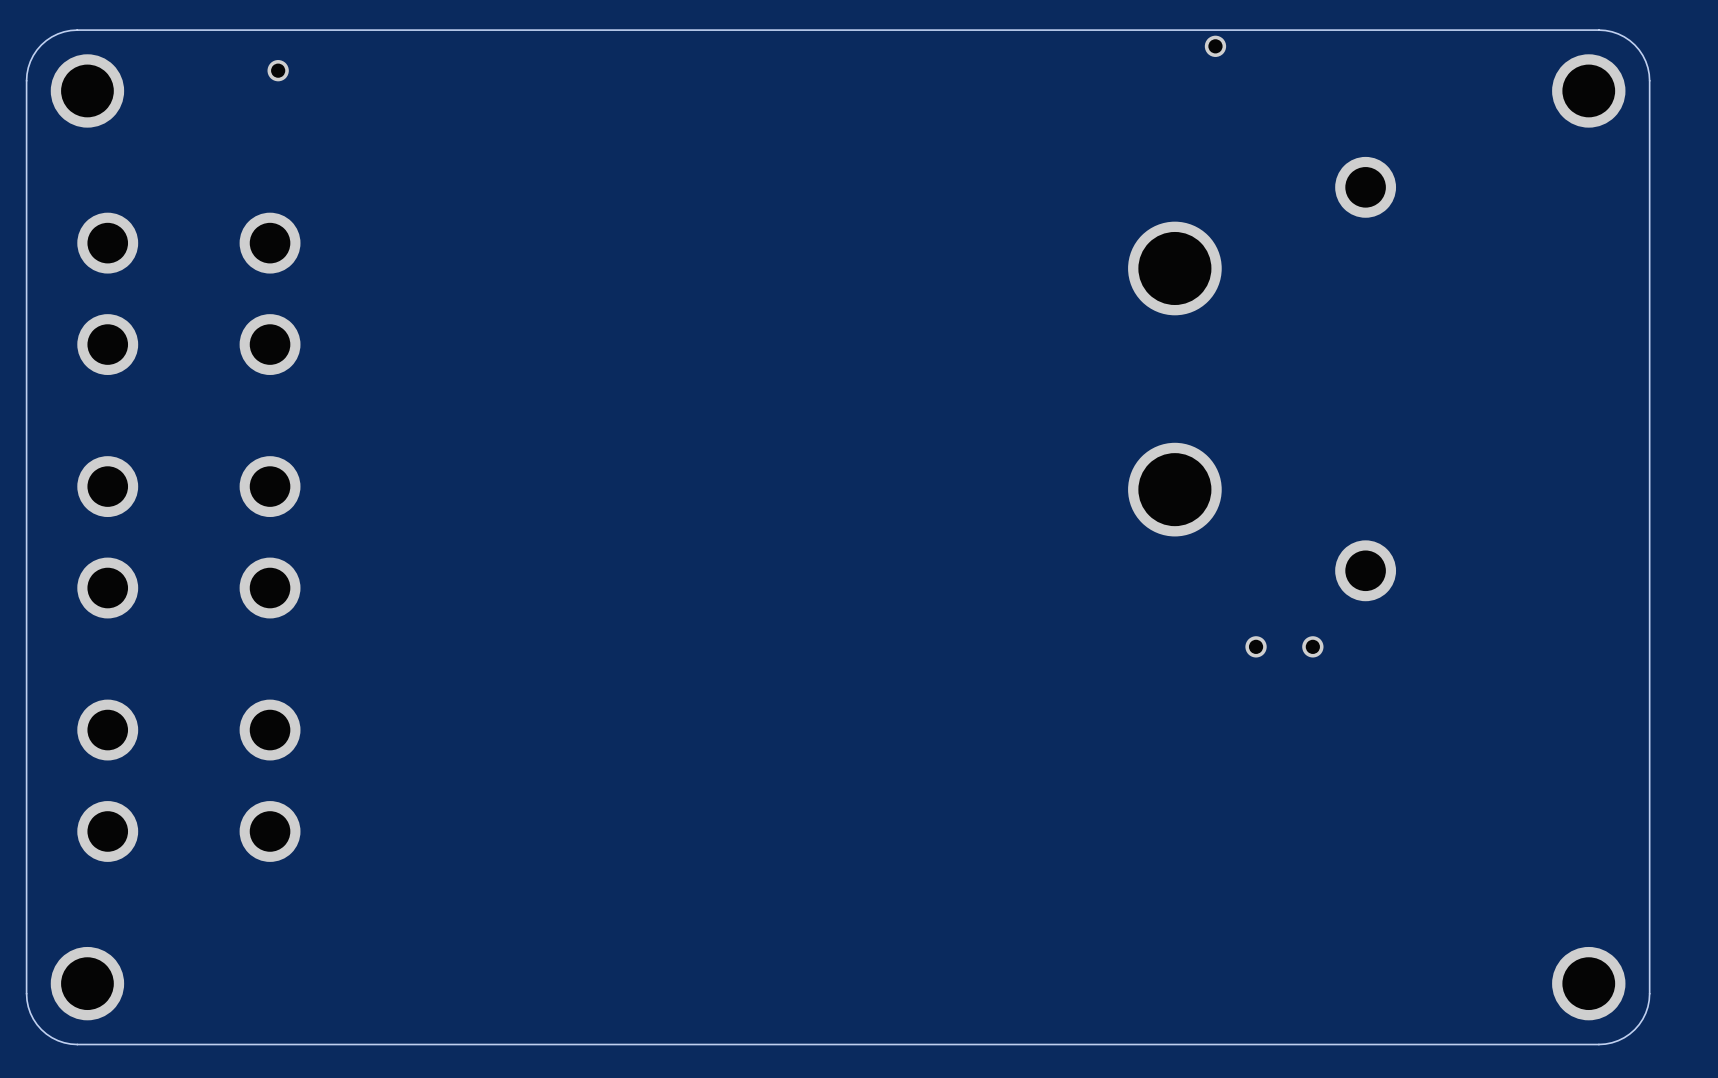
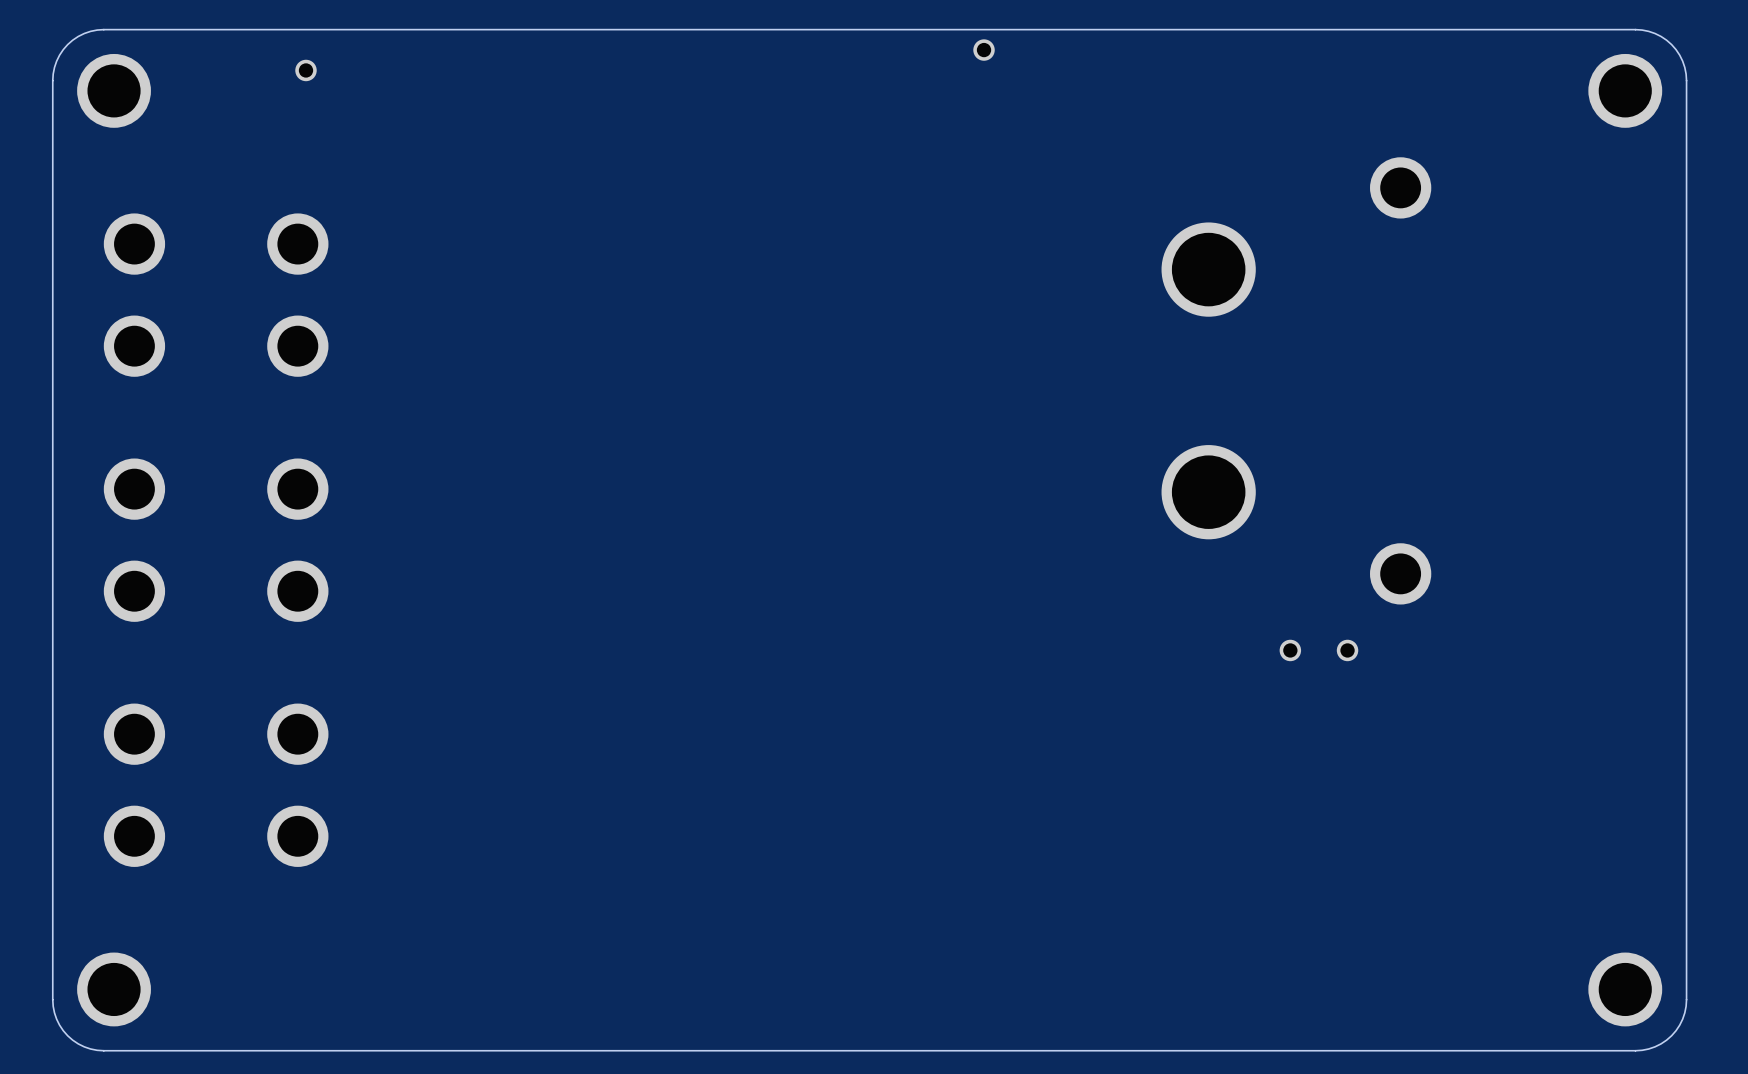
part position: (1215, 46) -> (984, 50)

